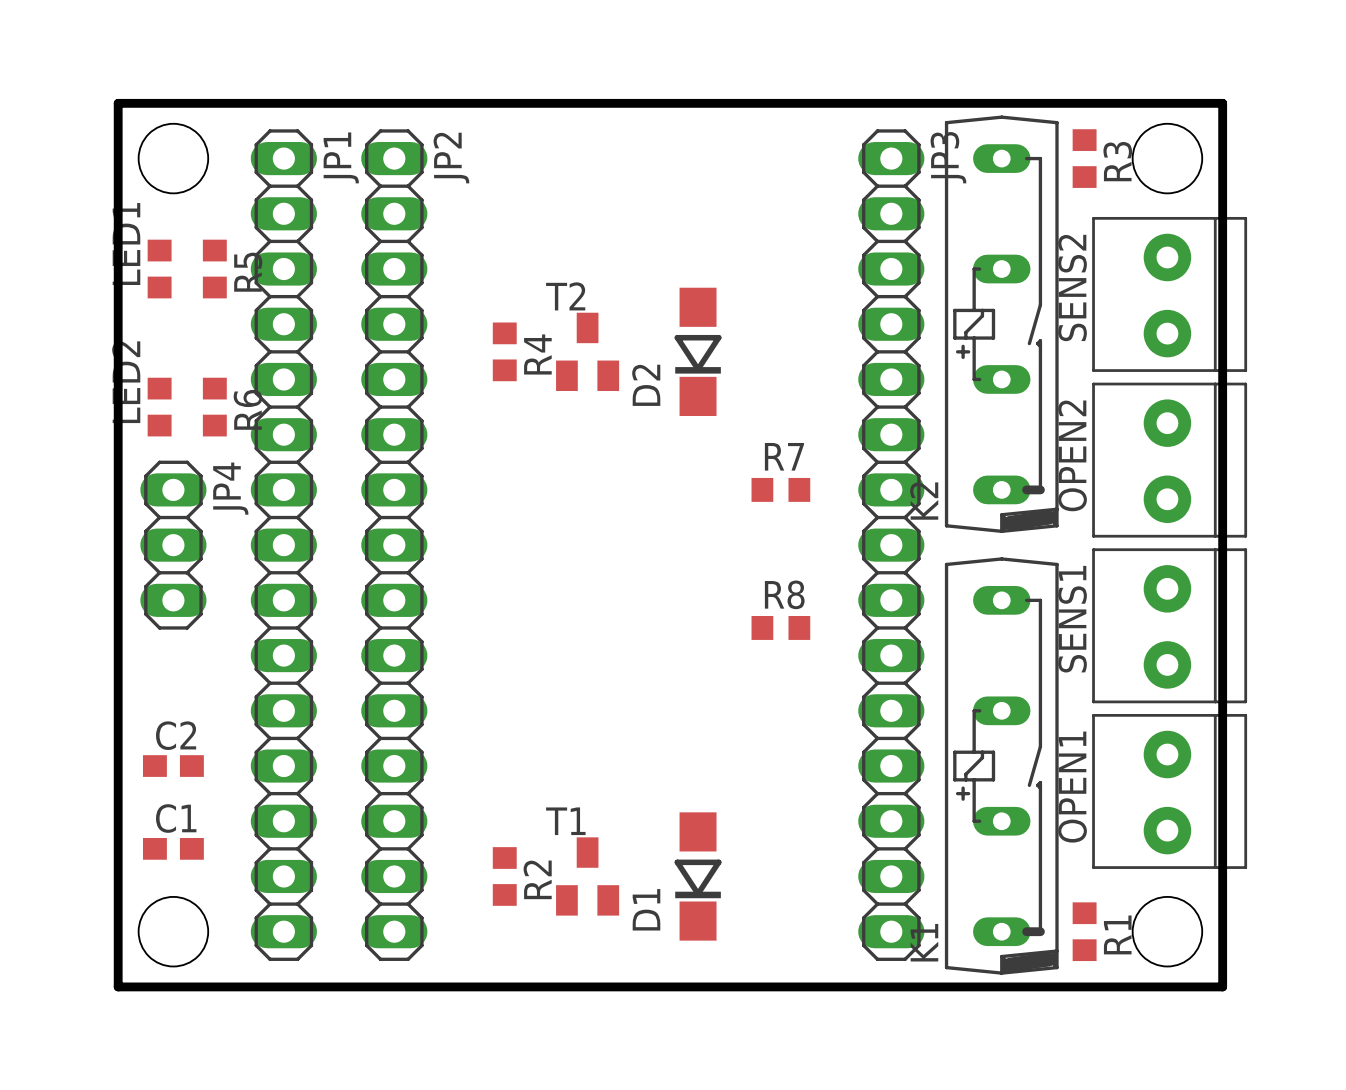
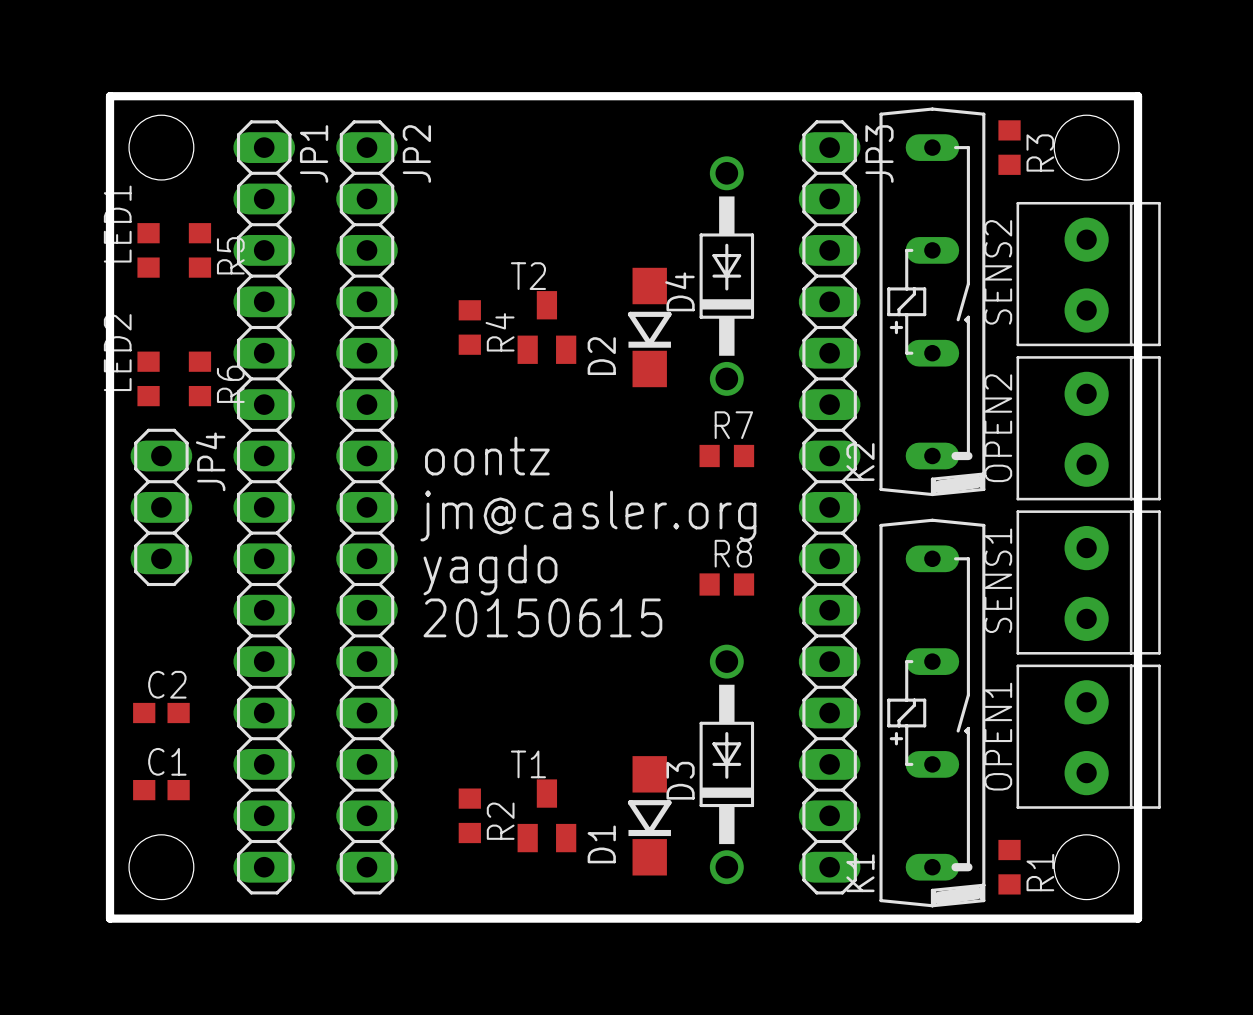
D4: none -> (726, 276)
text: none -> oontz (487, 456)
text: none -> jm@casler.org (588, 515)
text: none -> yagdo (490, 569)
text: none -> 20150615 (542, 617)
D3: none -> (726, 764)

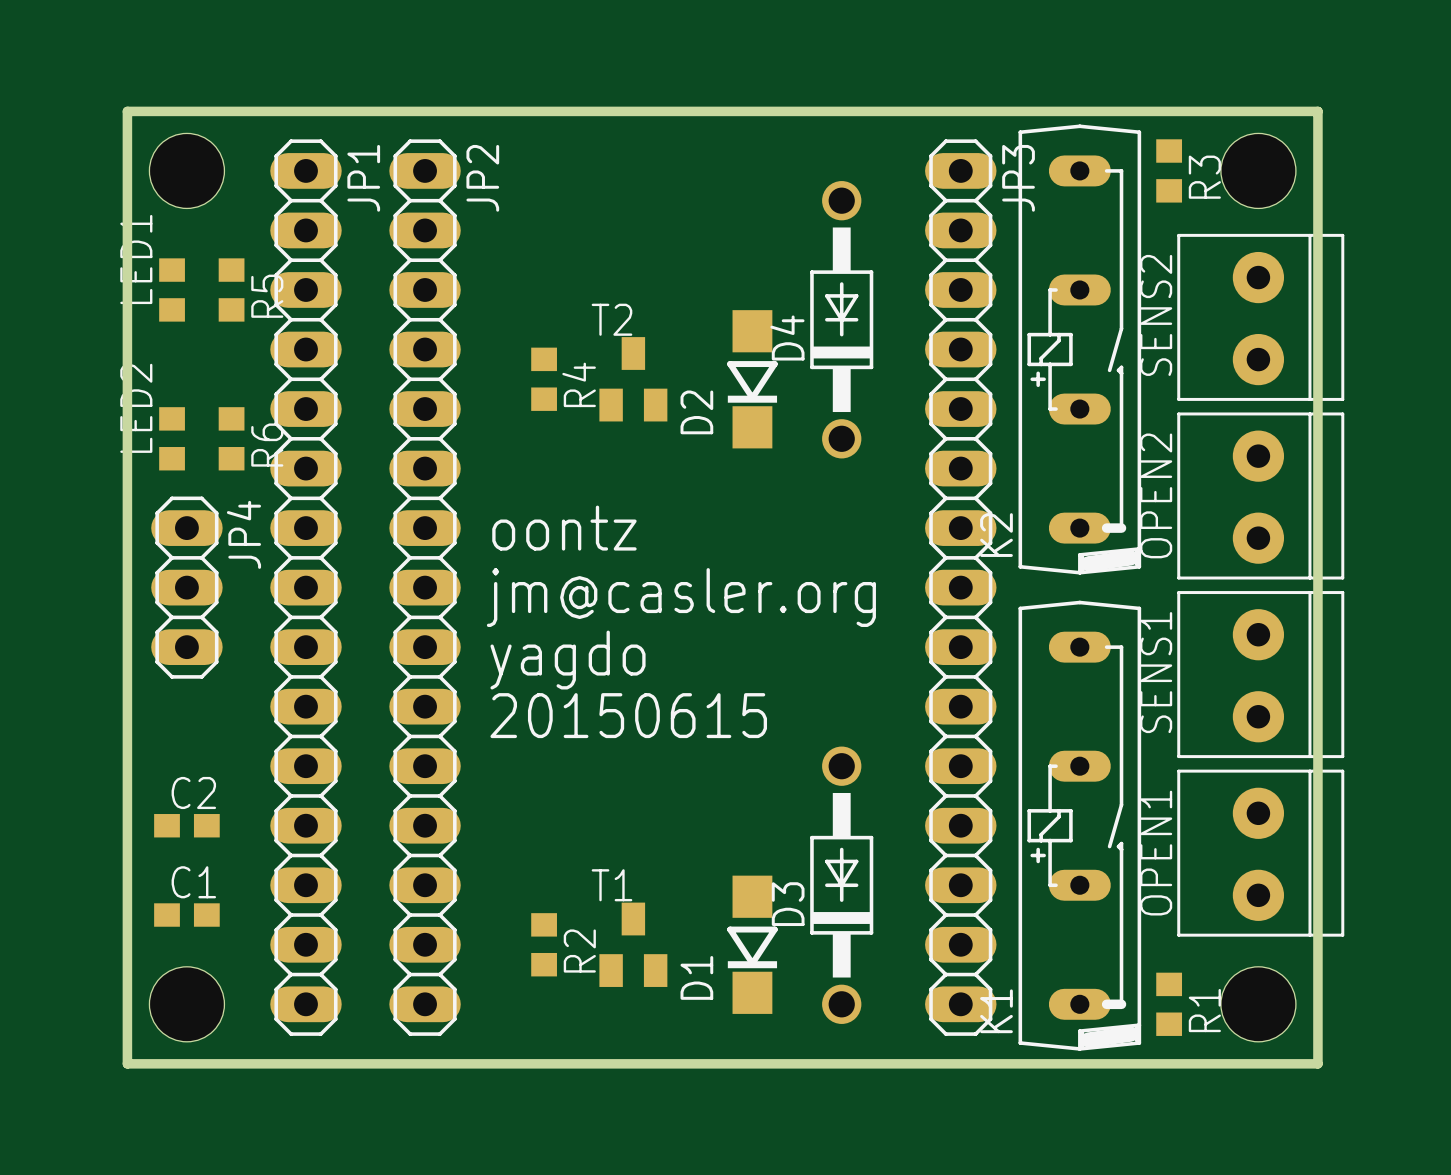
R7: (726, 456) -> none
R8: (726, 584) -> none

